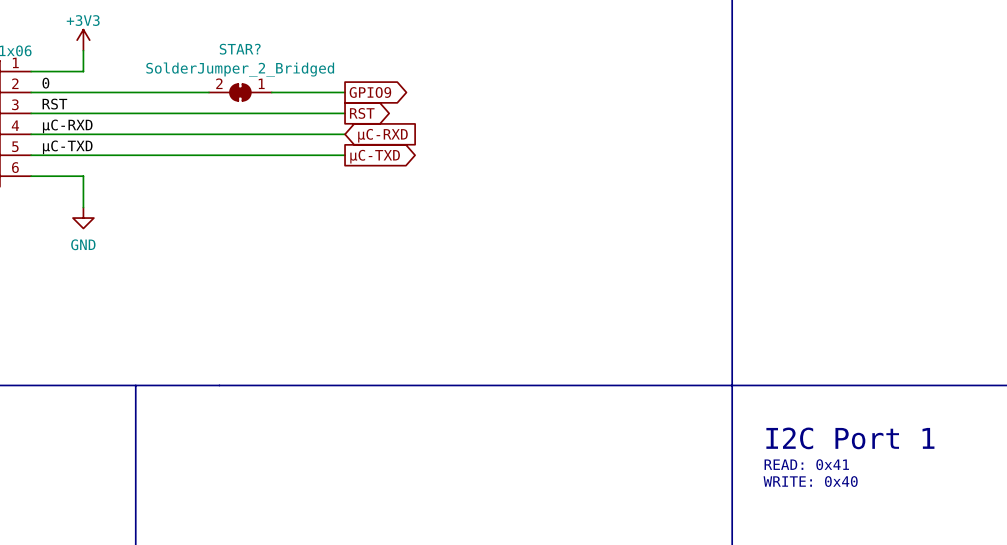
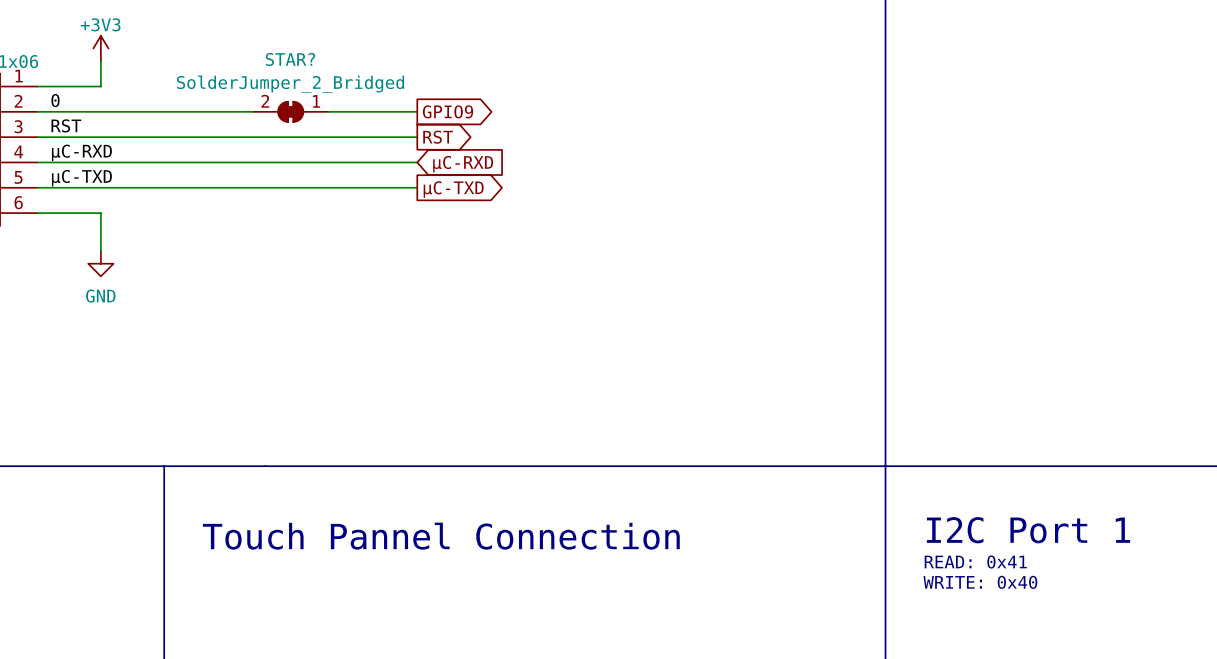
text: none -> Touch Pannel Connection (441, 536)

